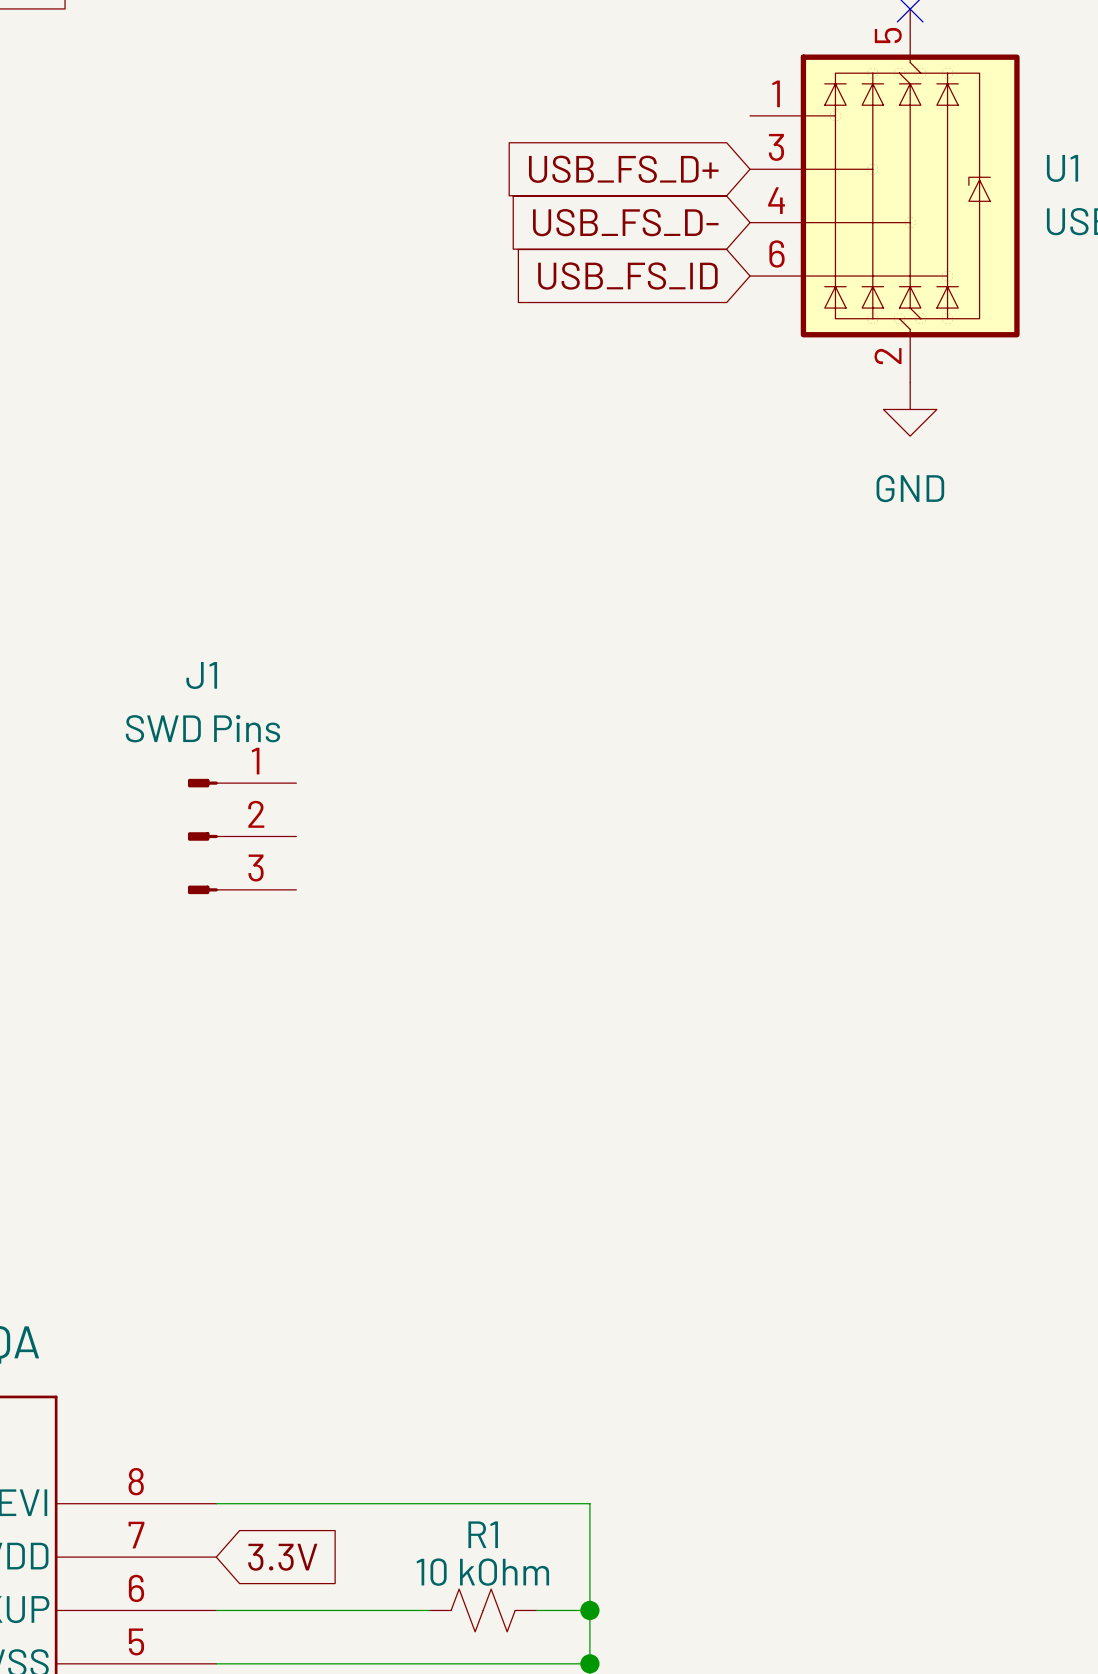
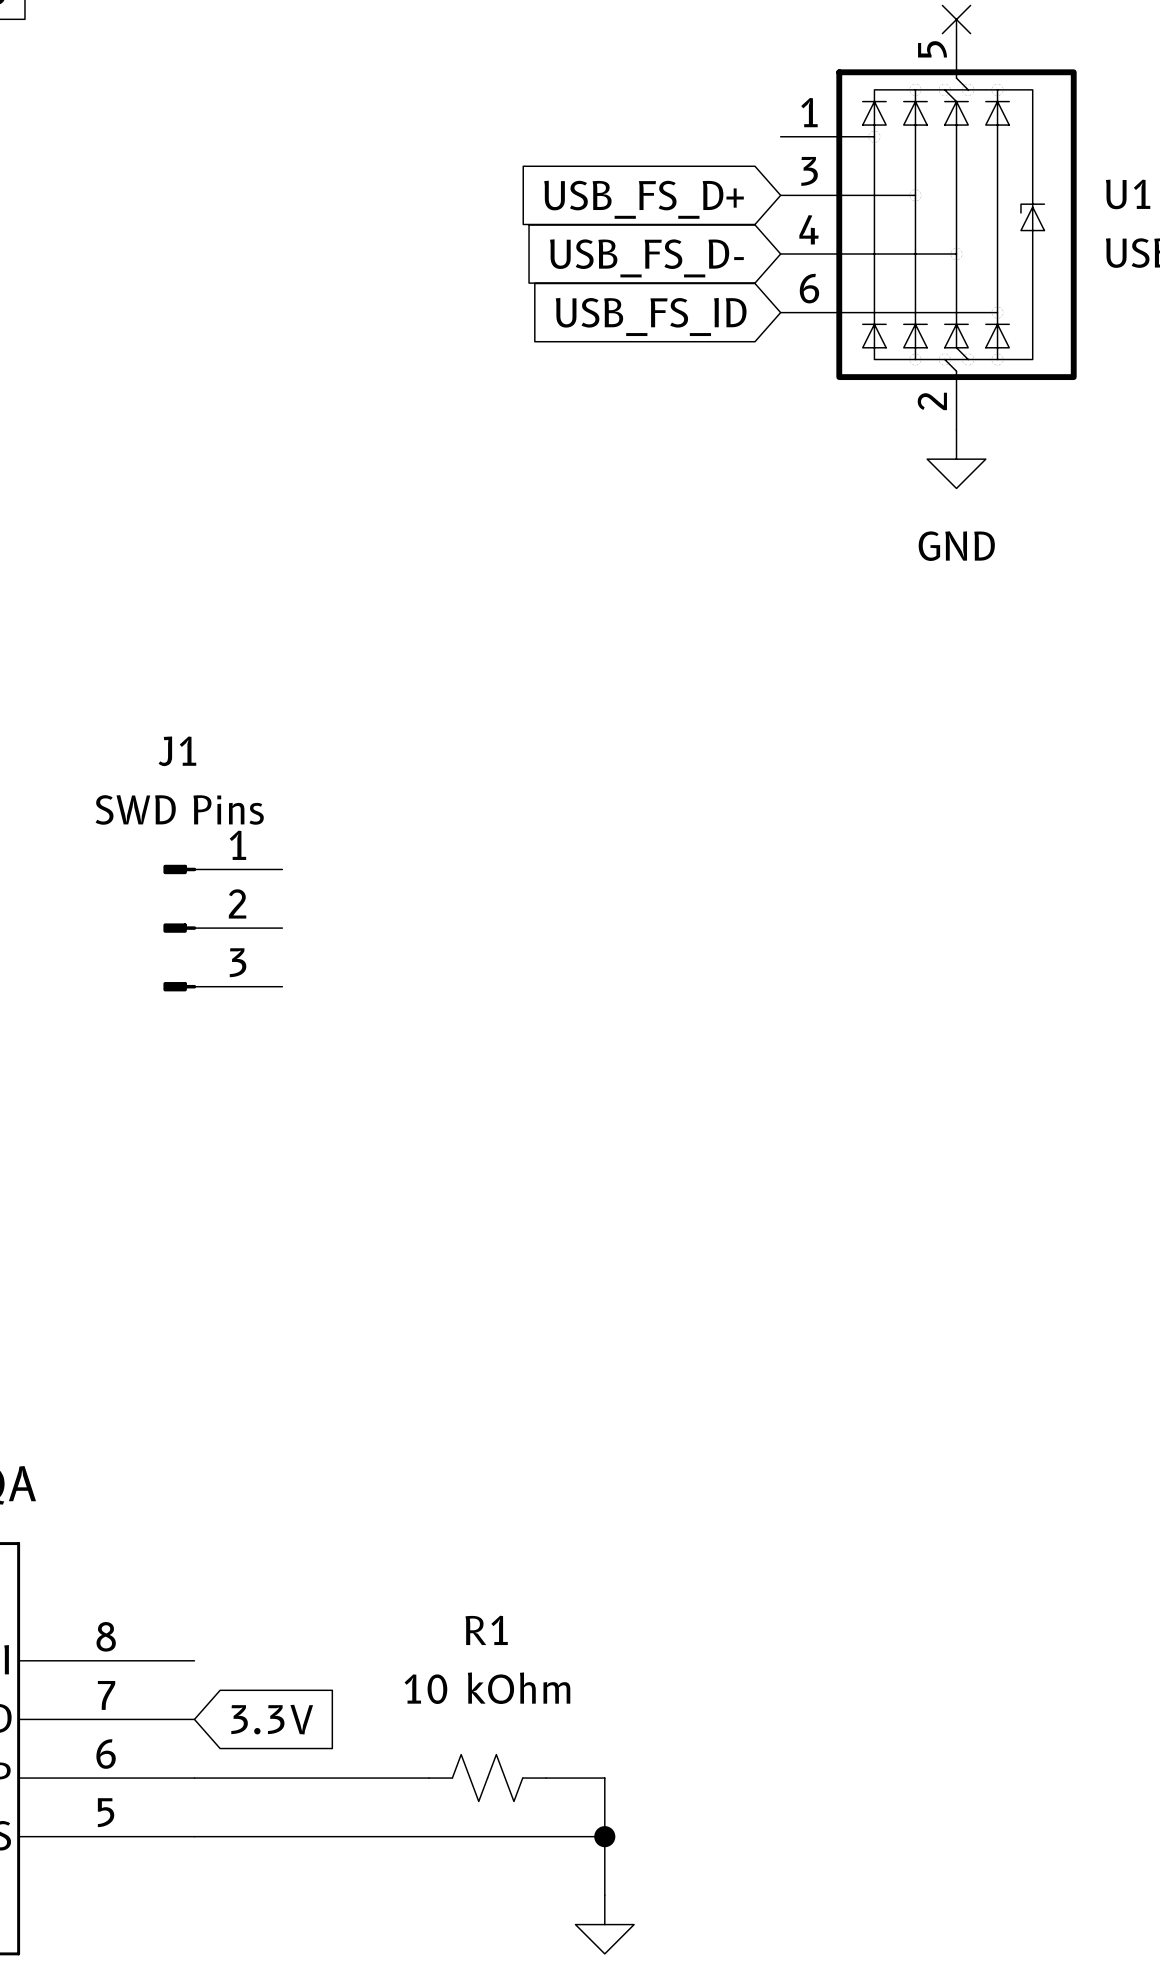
wire: (216, 1503) (589, 1503) (589, 1610) -> none
R1 name position: R1 (483, 1534) -> R1 (486, 1630)
R1 value position: 10 kOhm (482, 1572) -> 10 kOhm (487, 1688)
junction: (589, 1610) -> none

